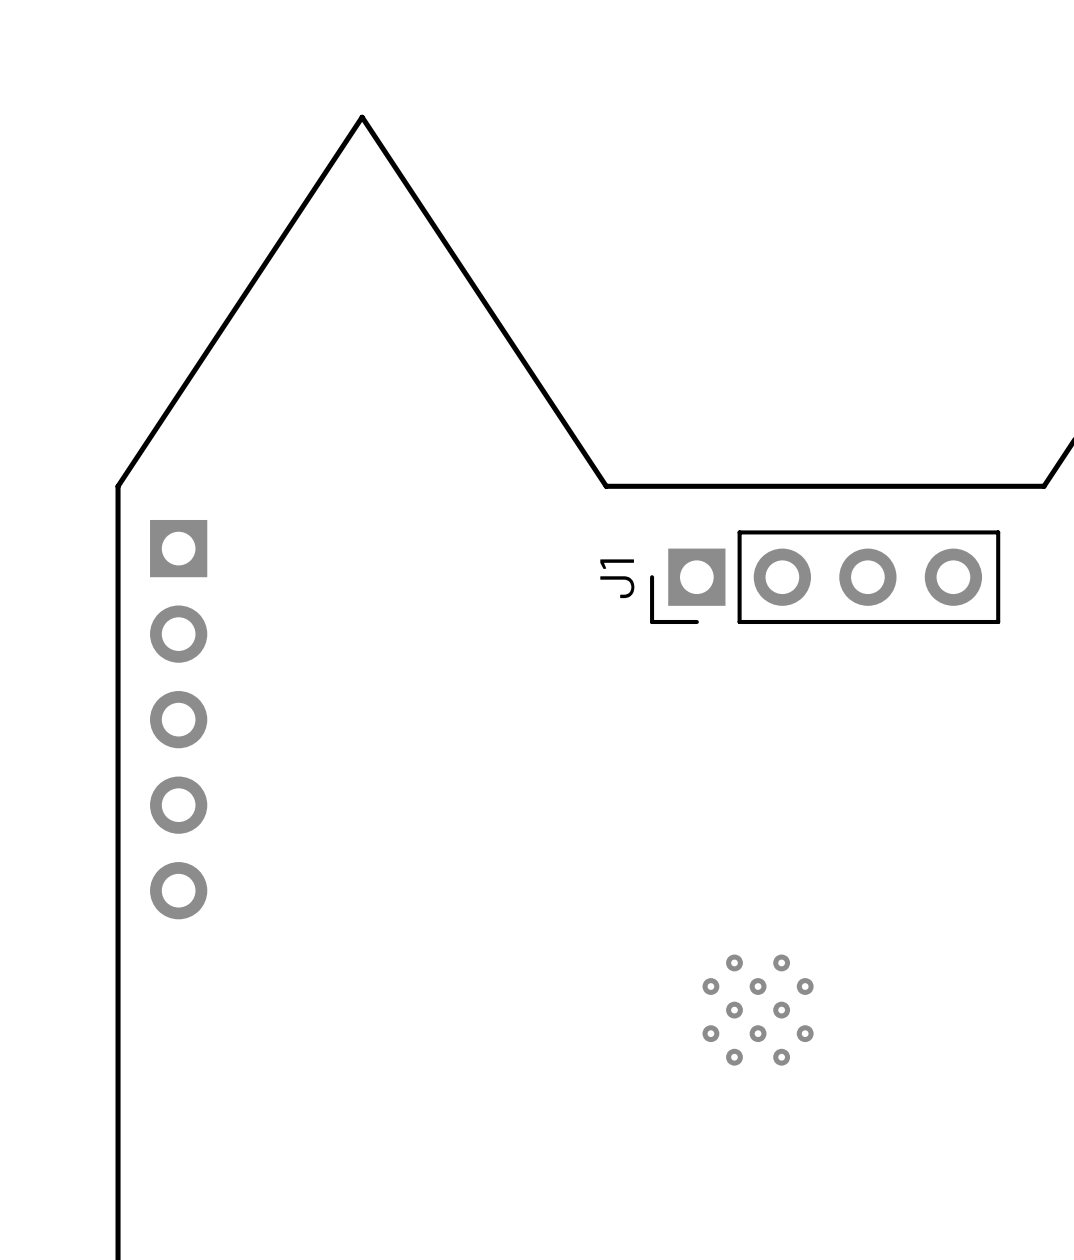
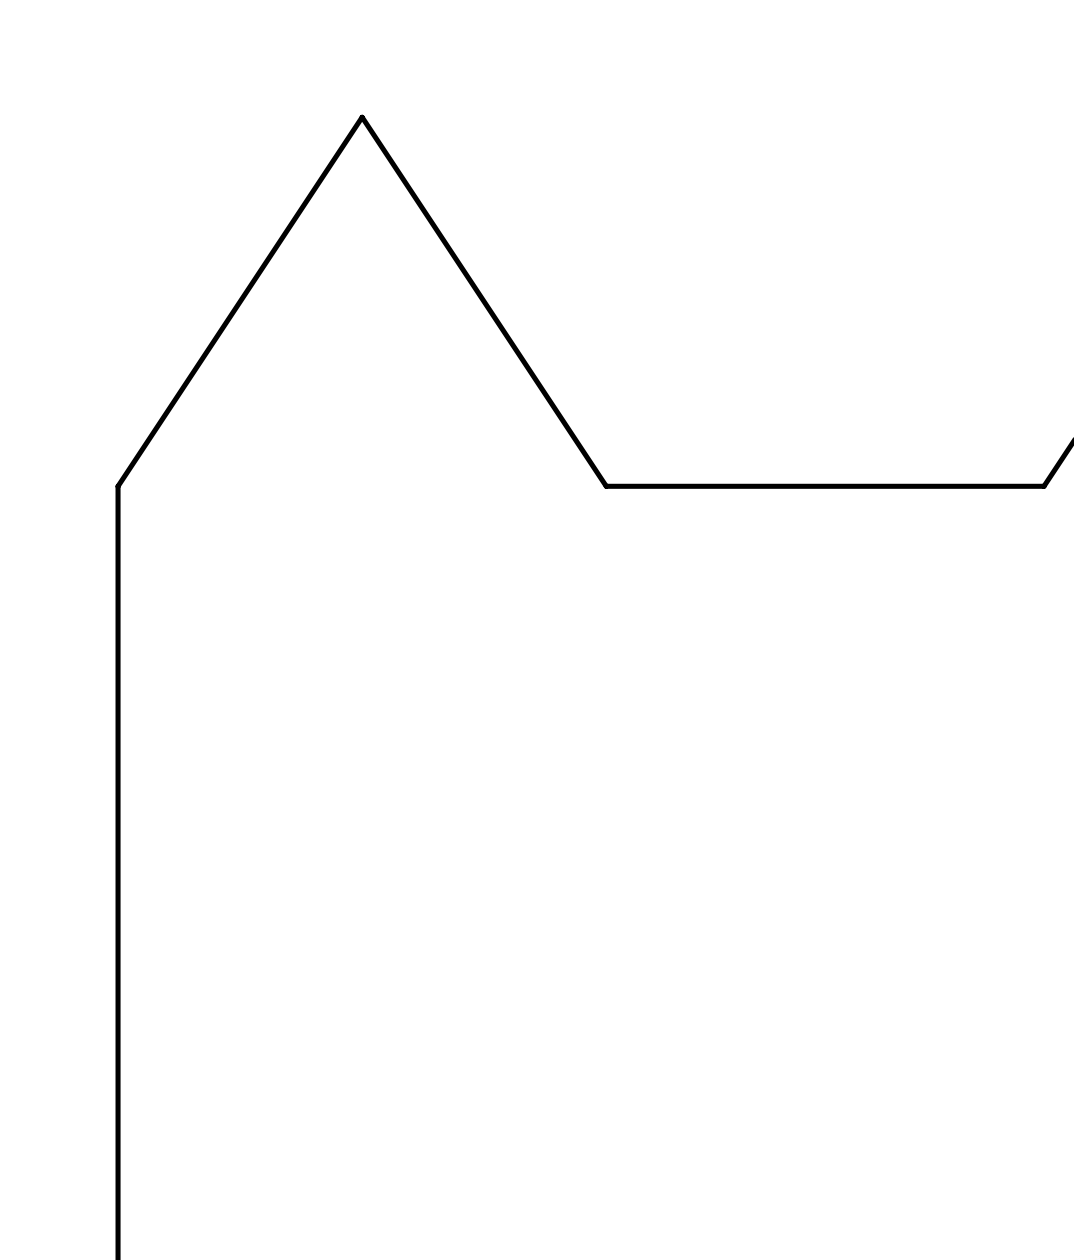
J1: (825, 577) -> none
part: (178, 719) -> none
part: (758, 1010) -> none

